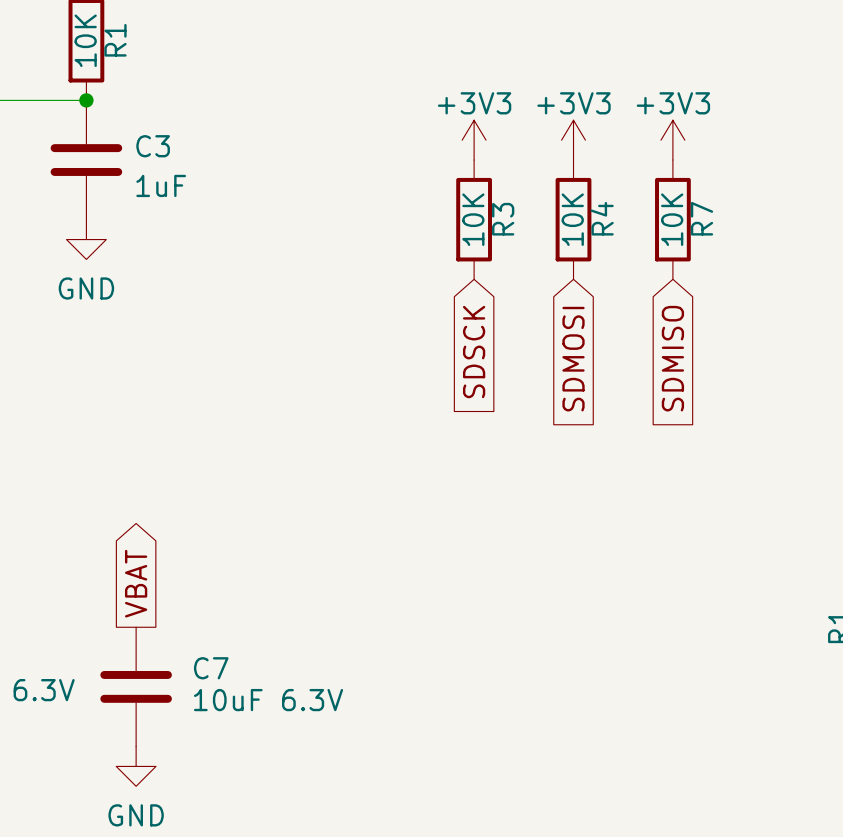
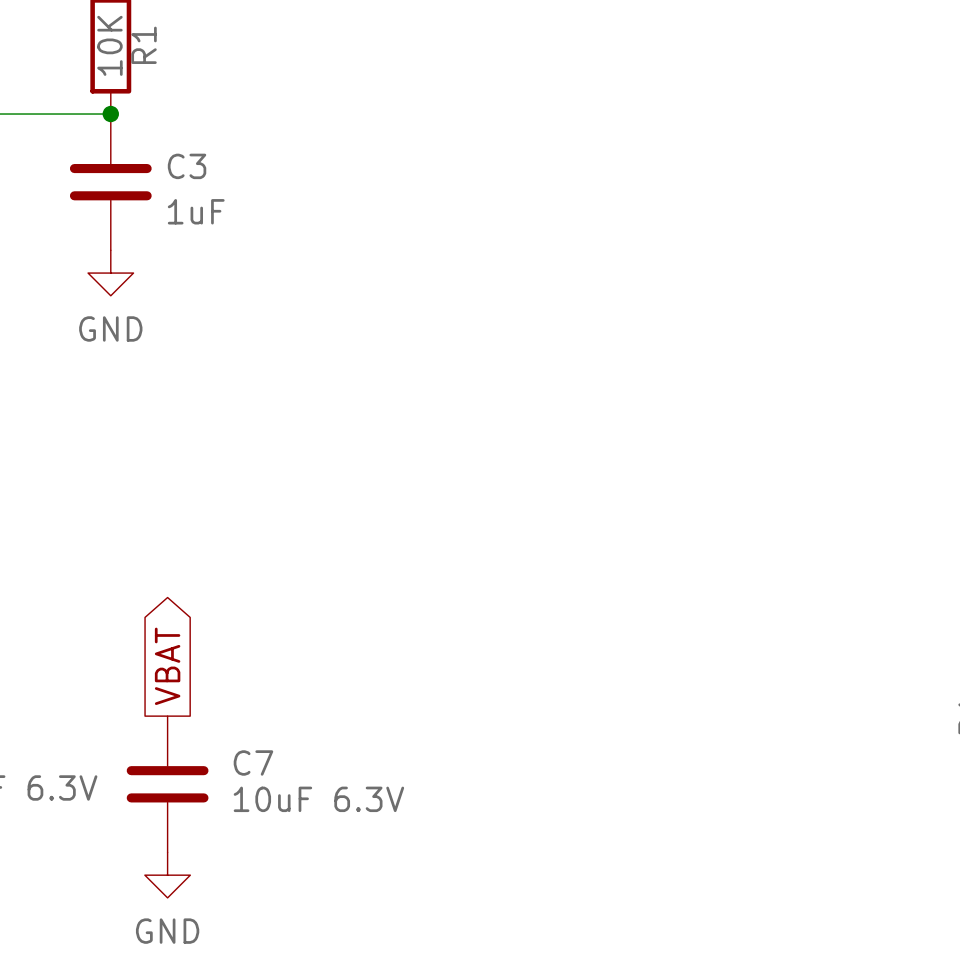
power symbol: +3V3 (474, 140) -> none
power symbol: +3V3 (573, 140) -> none
power symbol: +3V3 (672, 140) -> none
R3: 10K (474, 219) -> none
R4: 10K (573, 219) -> none
R7: 10K (672, 219) -> none
global label: SDSCK (474, 352) -> none
global label: SDMISO (672, 358) -> none
global label: SDMOSI (573, 359) -> none

